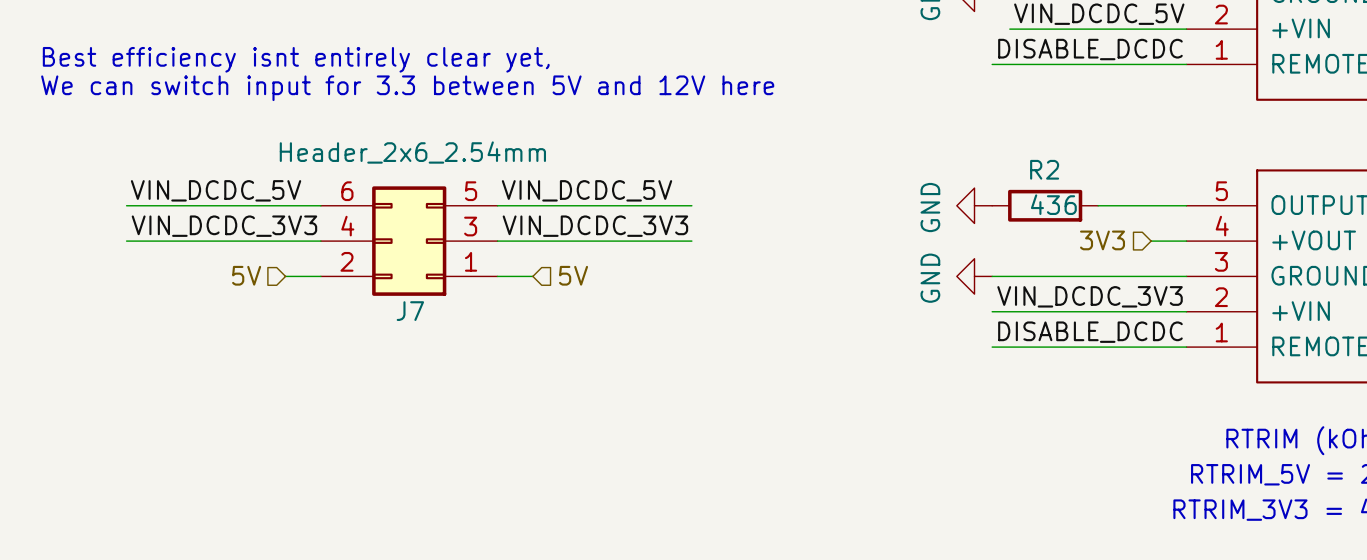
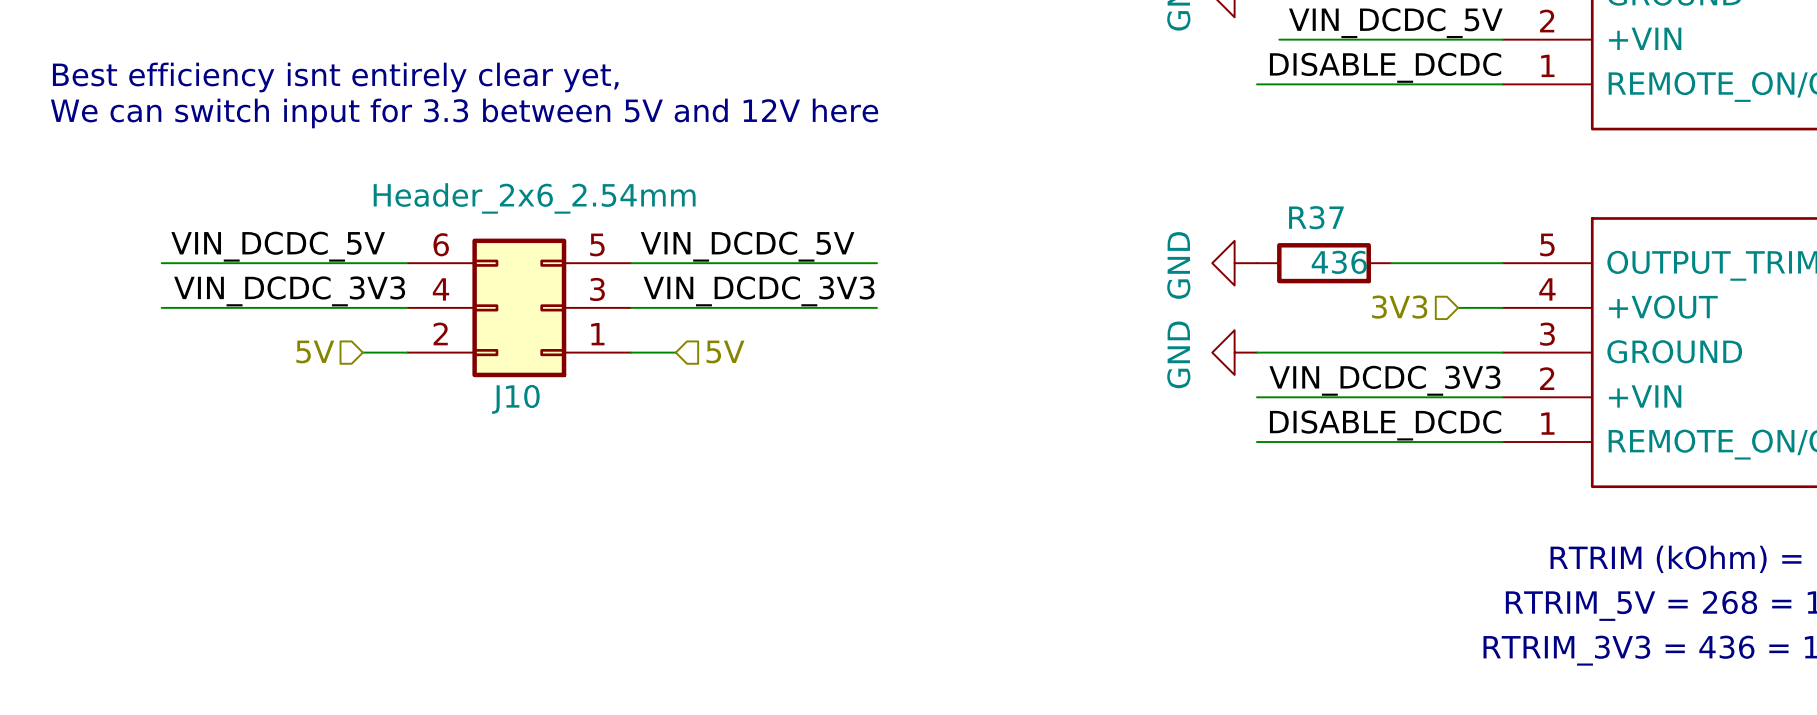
R2 name: R2 (1044, 169) -> R37 (1316, 217)
J7 name: J7 (410, 311) -> J10 (515, 399)

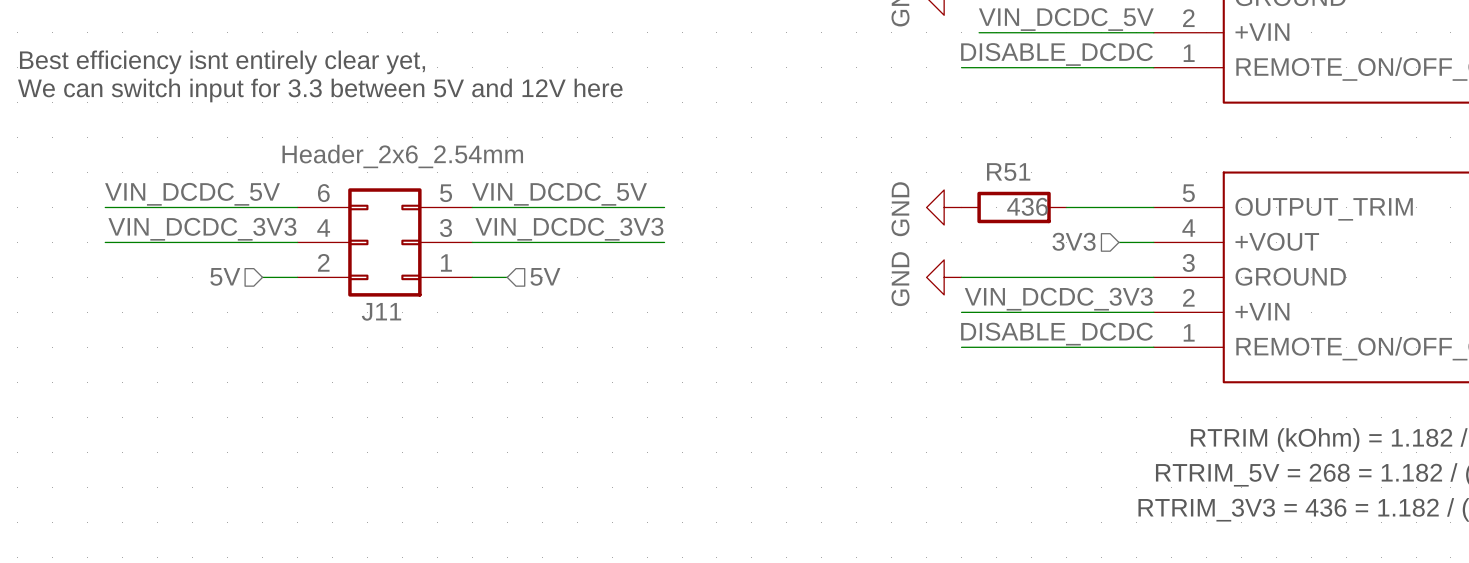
R37 name: R37 (1316, 217) -> R51 (1008, 172)
J10 name: J10 (515, 399) -> J11 (381, 311)

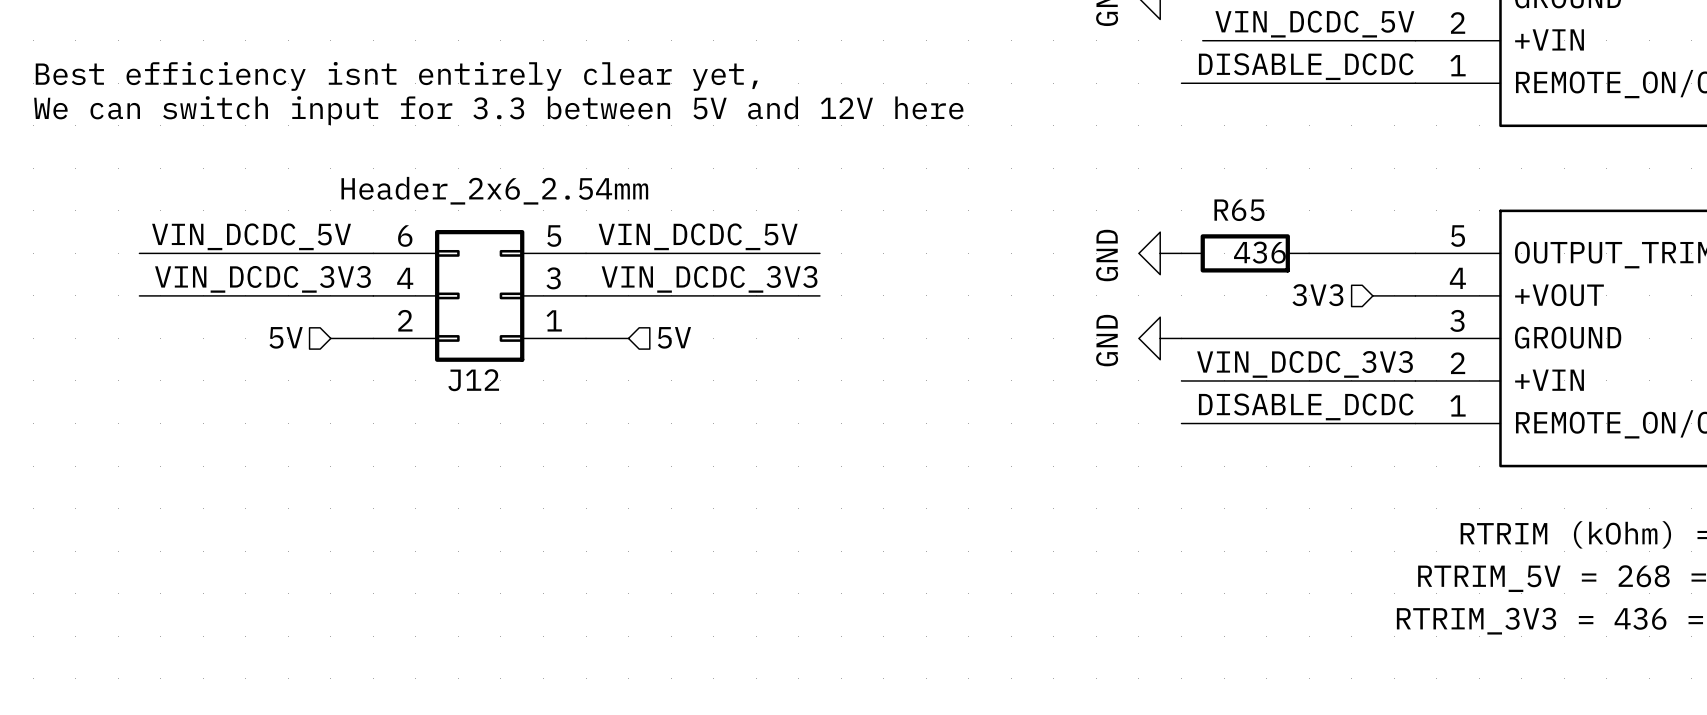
R51 name: R51 (1008, 172) -> R65 (1239, 210)
J11 name: J11 (381, 311) -> J12 (473, 380)

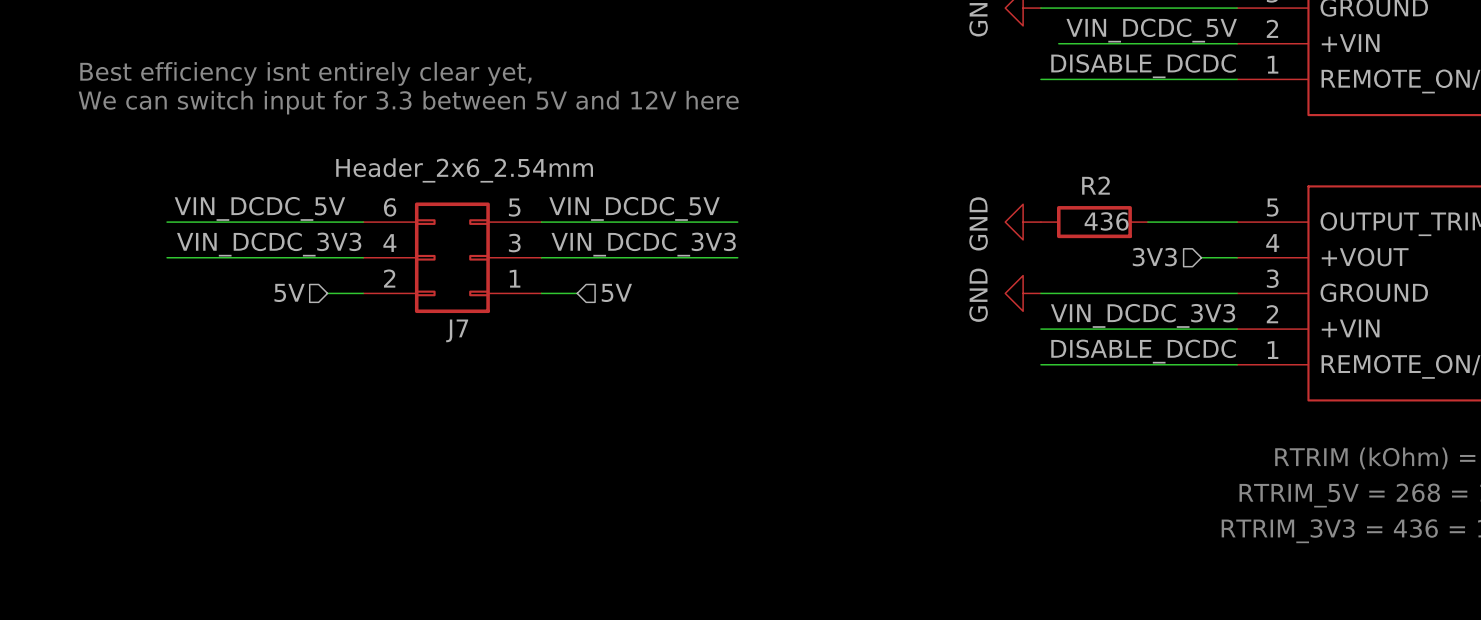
R65 name: R65 (1239, 210) -> R2 (1095, 185)
J12 name: J12 (473, 380) -> J7 (457, 330)

